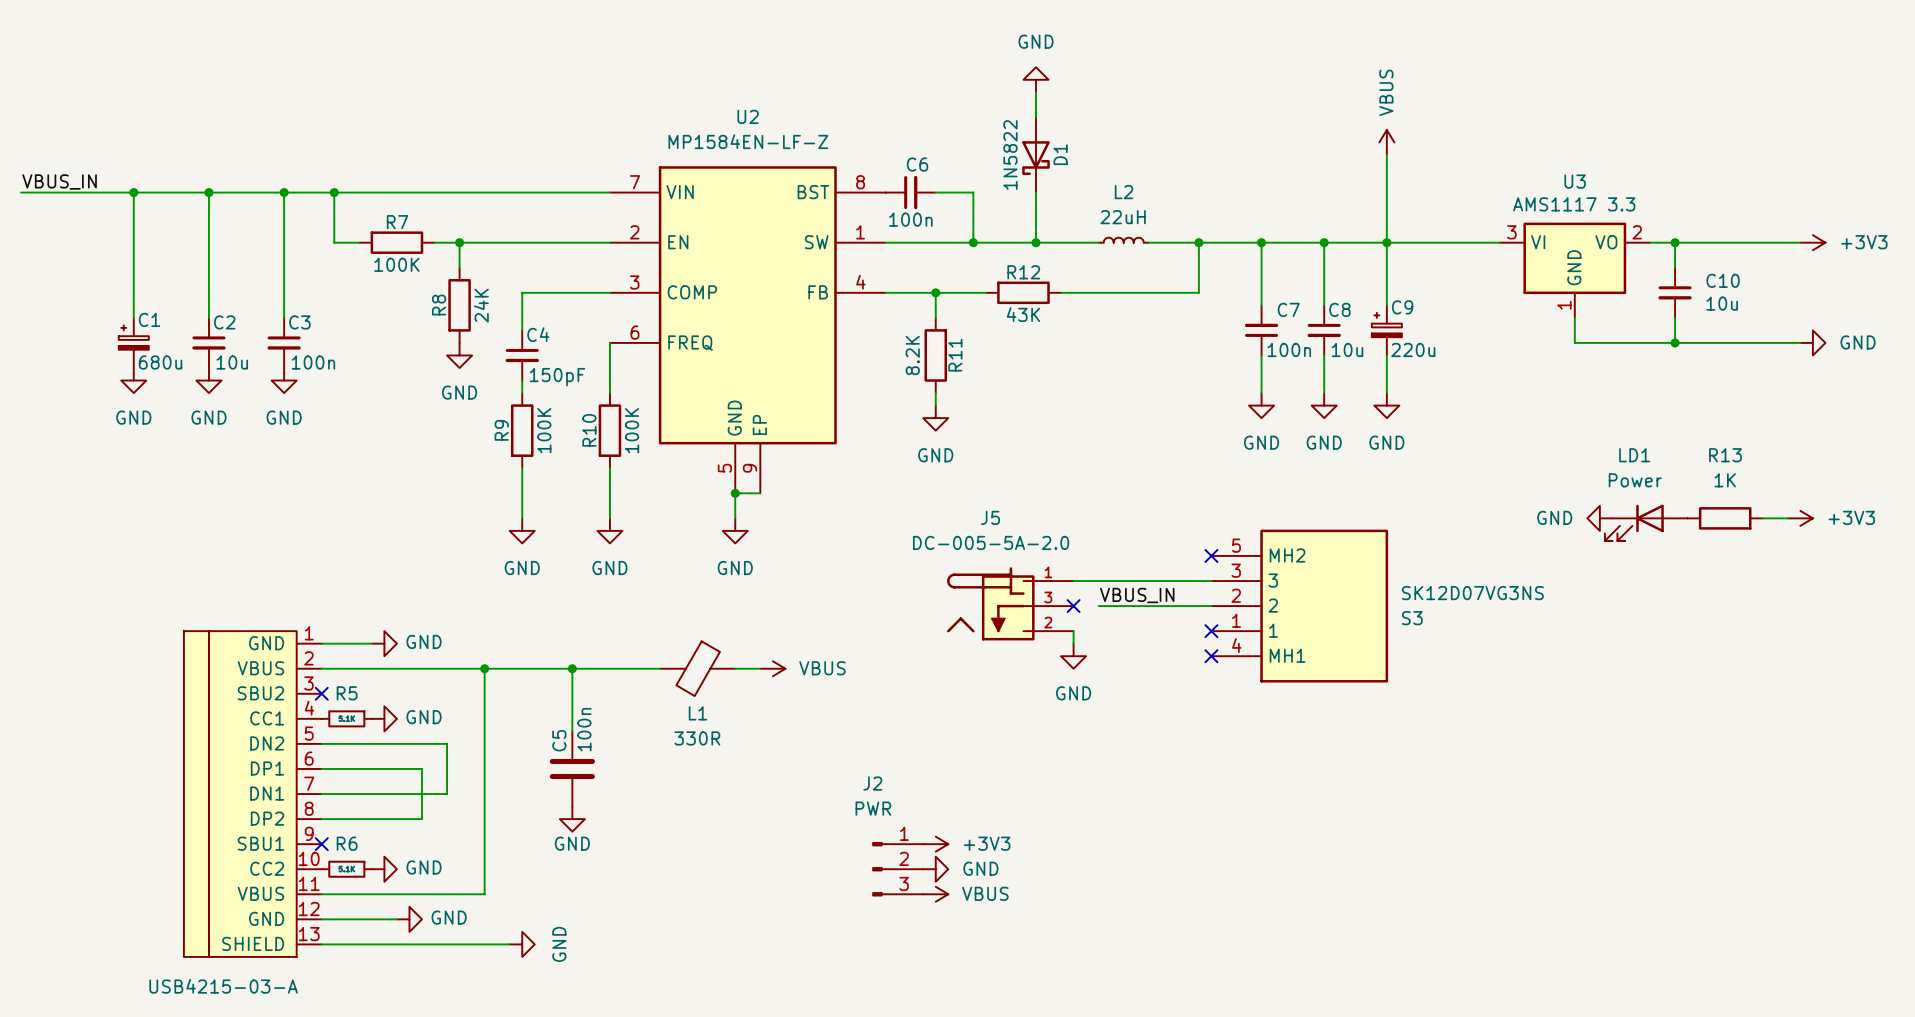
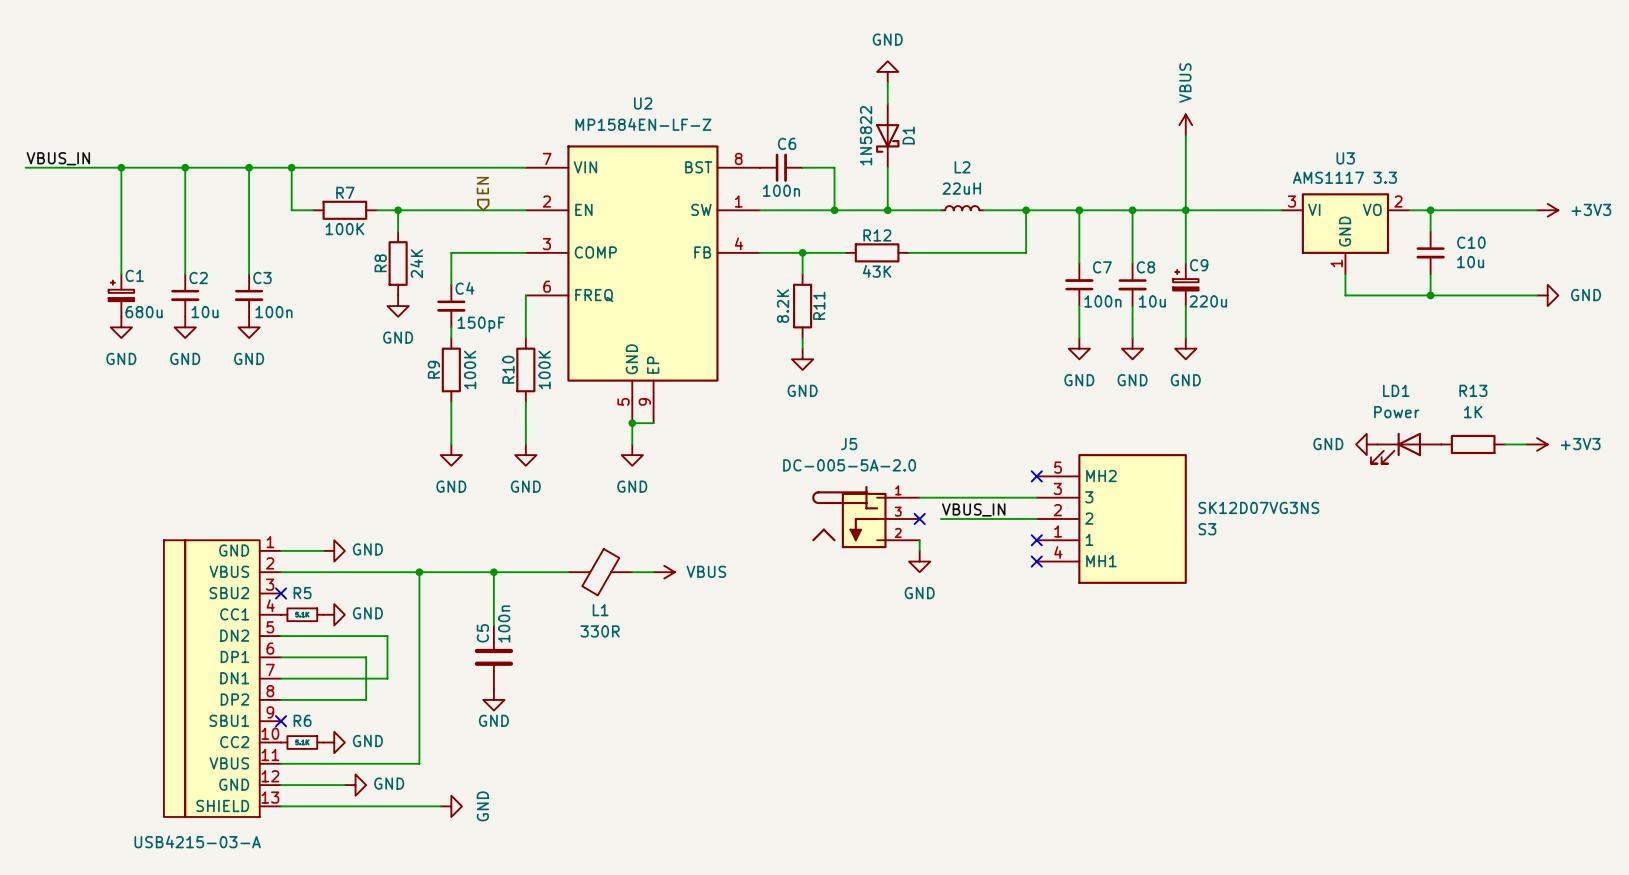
hierarchical label: none -> EN (482, 185)
power symbol: +3V3 (935, 844) -> none
J2: PWR (897, 869) -> none
power symbol: GND (935, 869) -> none
power symbol: VBUS (935, 894) -> none

